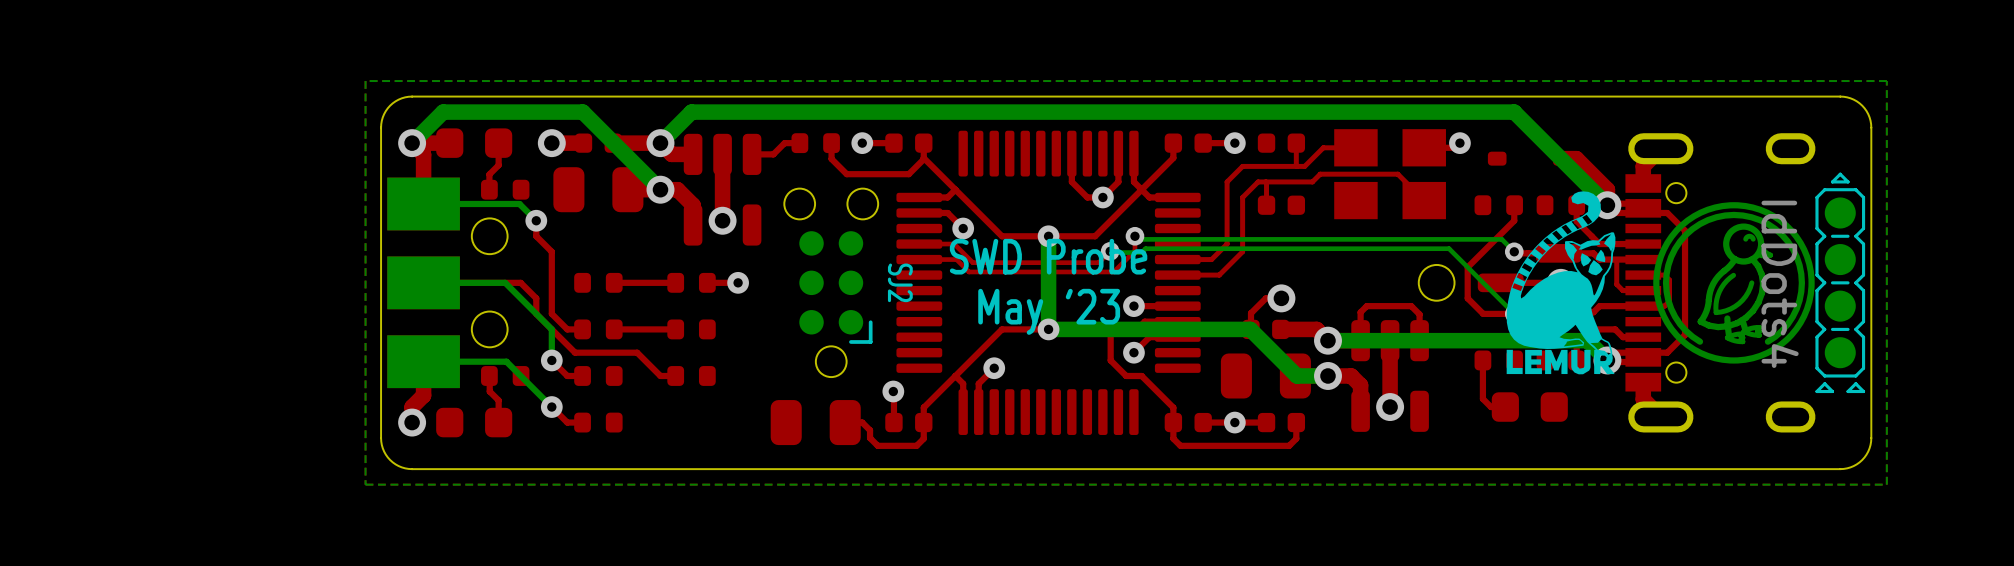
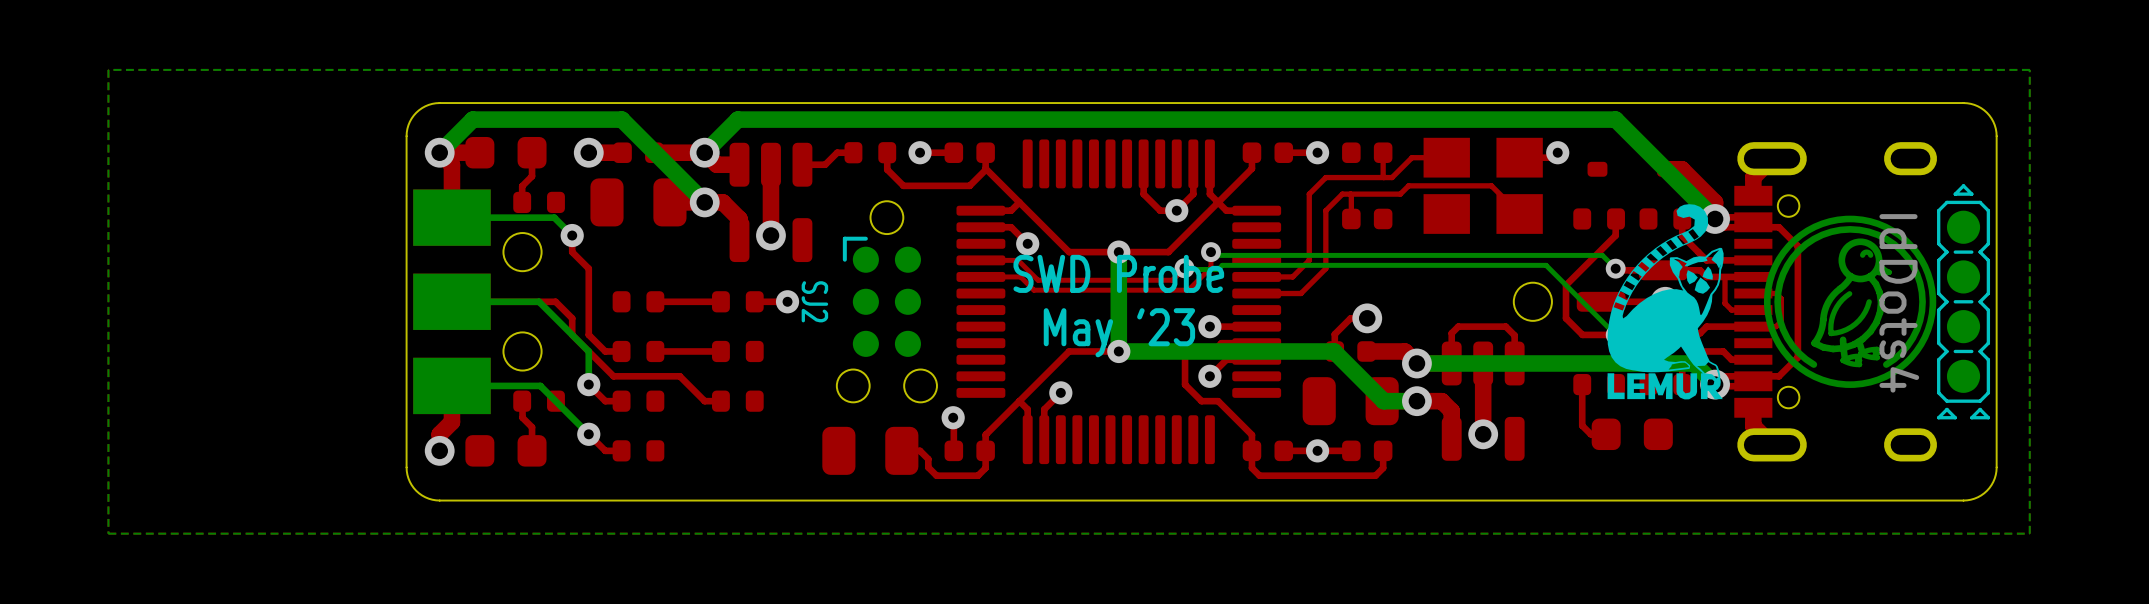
bottom zone outline: (1886, 81) (1886, 484) (365, 484) (365, 81) (1886, 81) -> (2029, 69) (2029, 533) (108, 533) (108, 69) (2029, 69)
SJ2 rotation: 0° (831, 282) -> 180° (886, 301)

